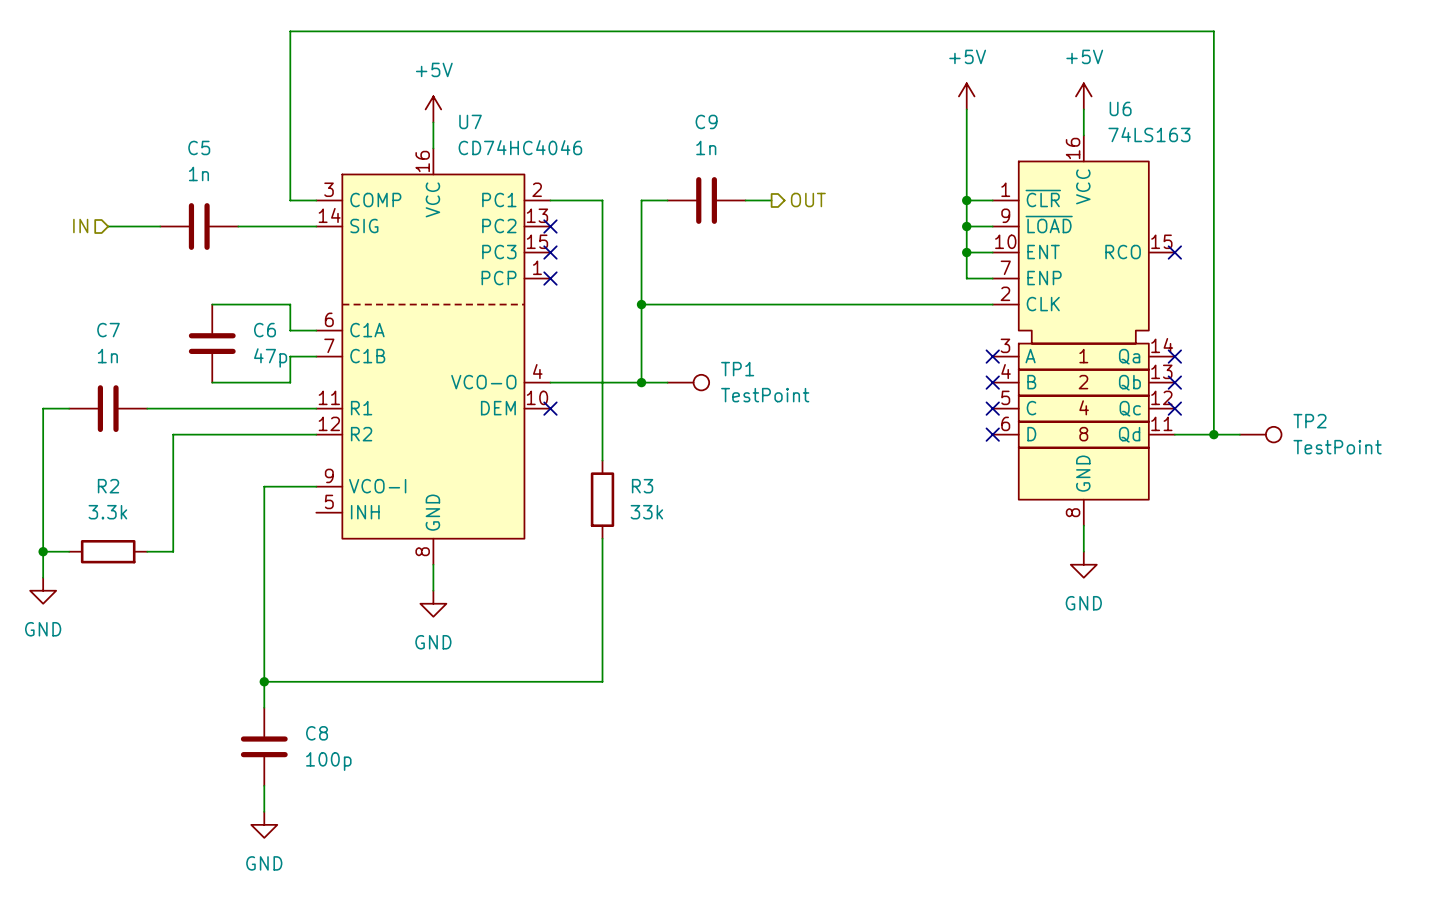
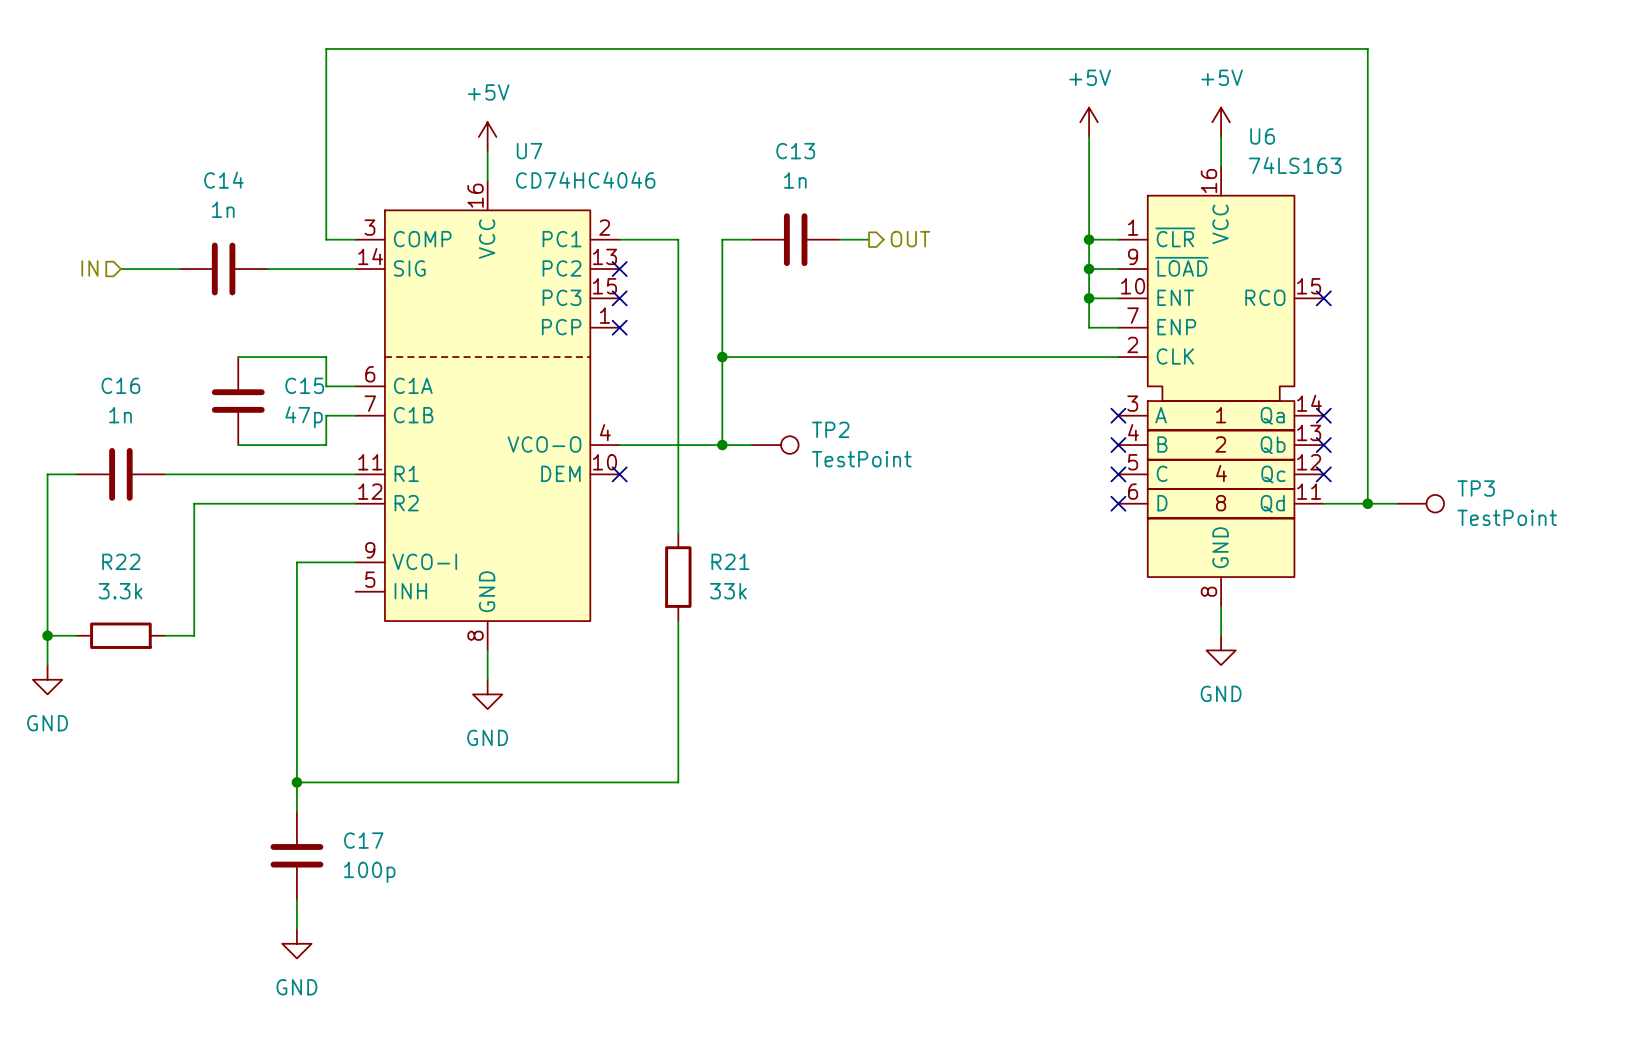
C9 name: C9 (706, 121) -> C13 (795, 151)
C5 name: C5 (199, 147) -> C14 (223, 180)
C7 name: C7 (108, 330) -> C16 (120, 385)
C6 name: C6 (265, 330) -> C15 (304, 385)
TP1 name: TP1 (737, 369) -> TP2 (830, 429)
TP2 name: TP2 (1309, 421) -> TP3 (1476, 488)
R2 name: R2 (108, 486) -> R22 (121, 561)
R3 name: R3 (642, 486) -> R21 (730, 561)
C8 name: C8 (317, 733) -> C17 (363, 840)

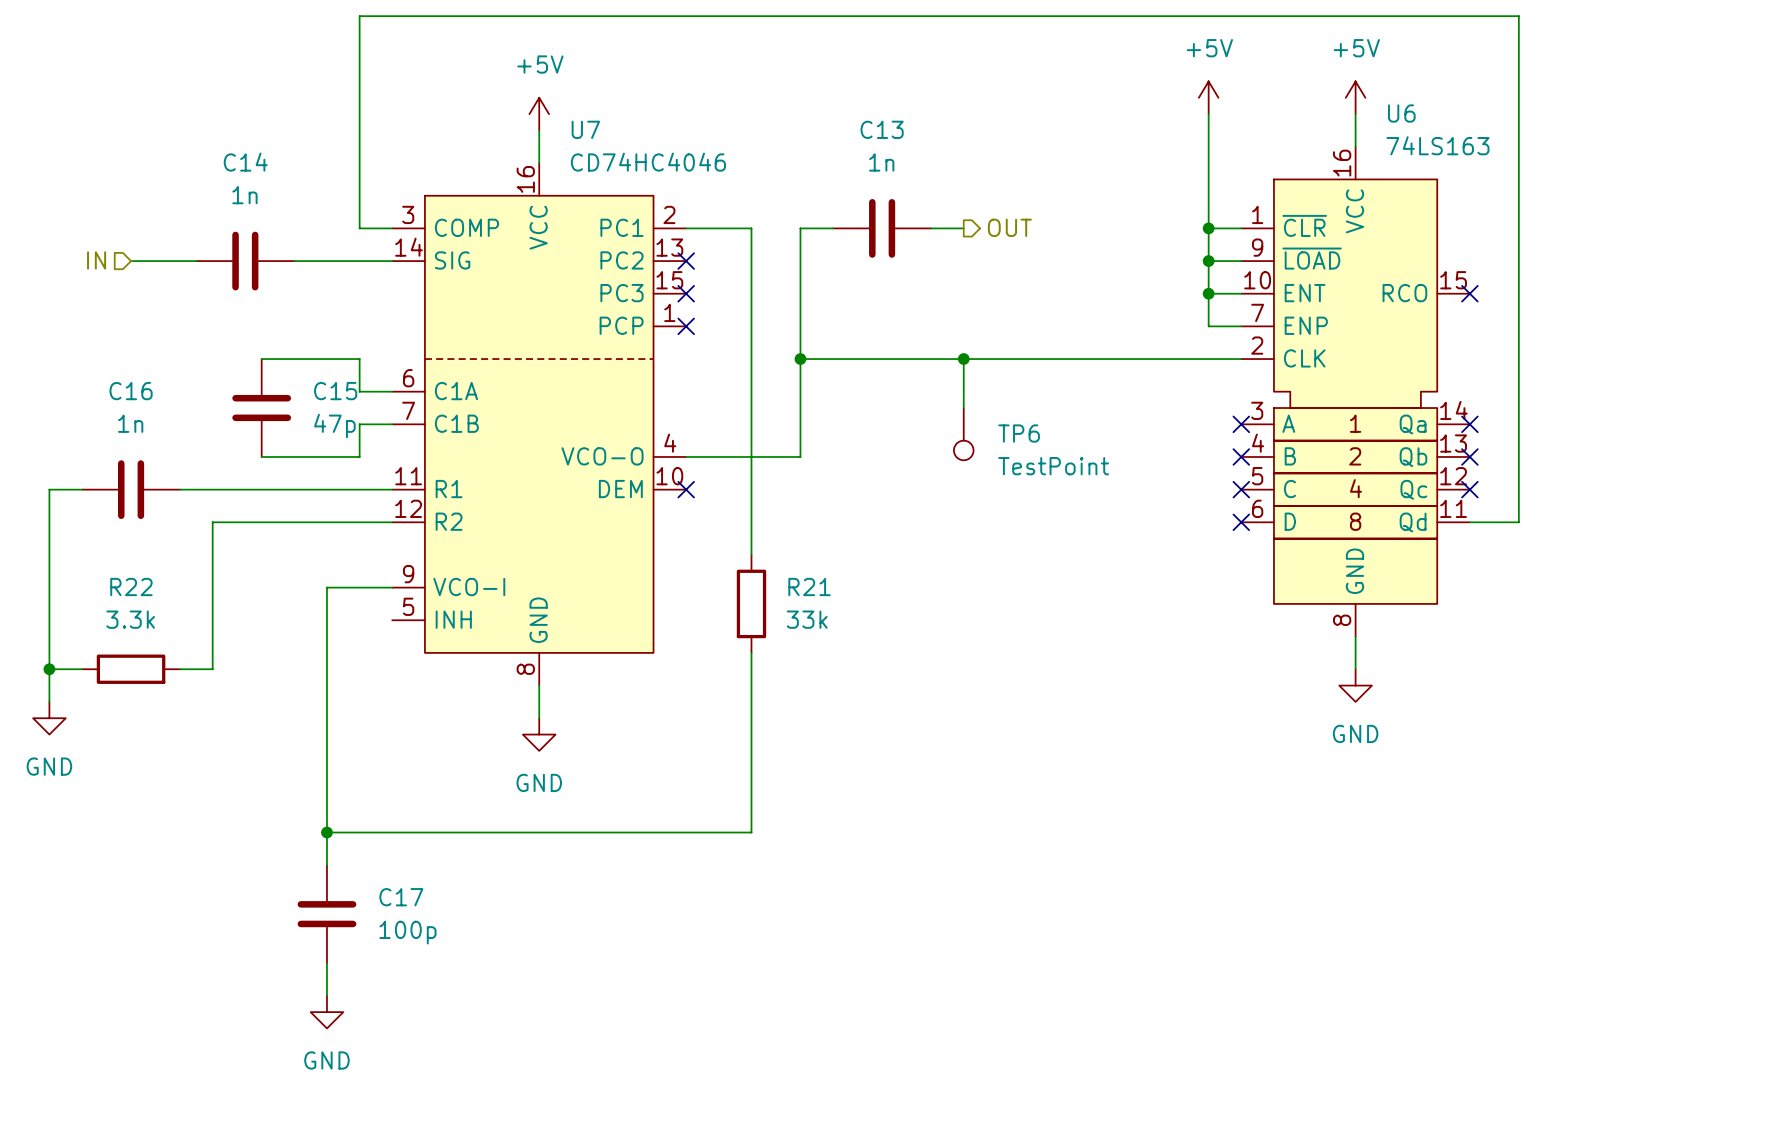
wire: none -> (963, 359) (963, 408)
junction: none -> (963, 359)
TP6: none -> TestPoint (963, 434)
wire: (722, 445) (751, 445) -> none
junction: (722, 445) -> none
TP2: TestPoint (775, 445) -> none
wire: (1367, 503) (1397, 503) -> none
junction: (1367, 503) -> none
TP3: TestPoint (1420, 503) -> none

